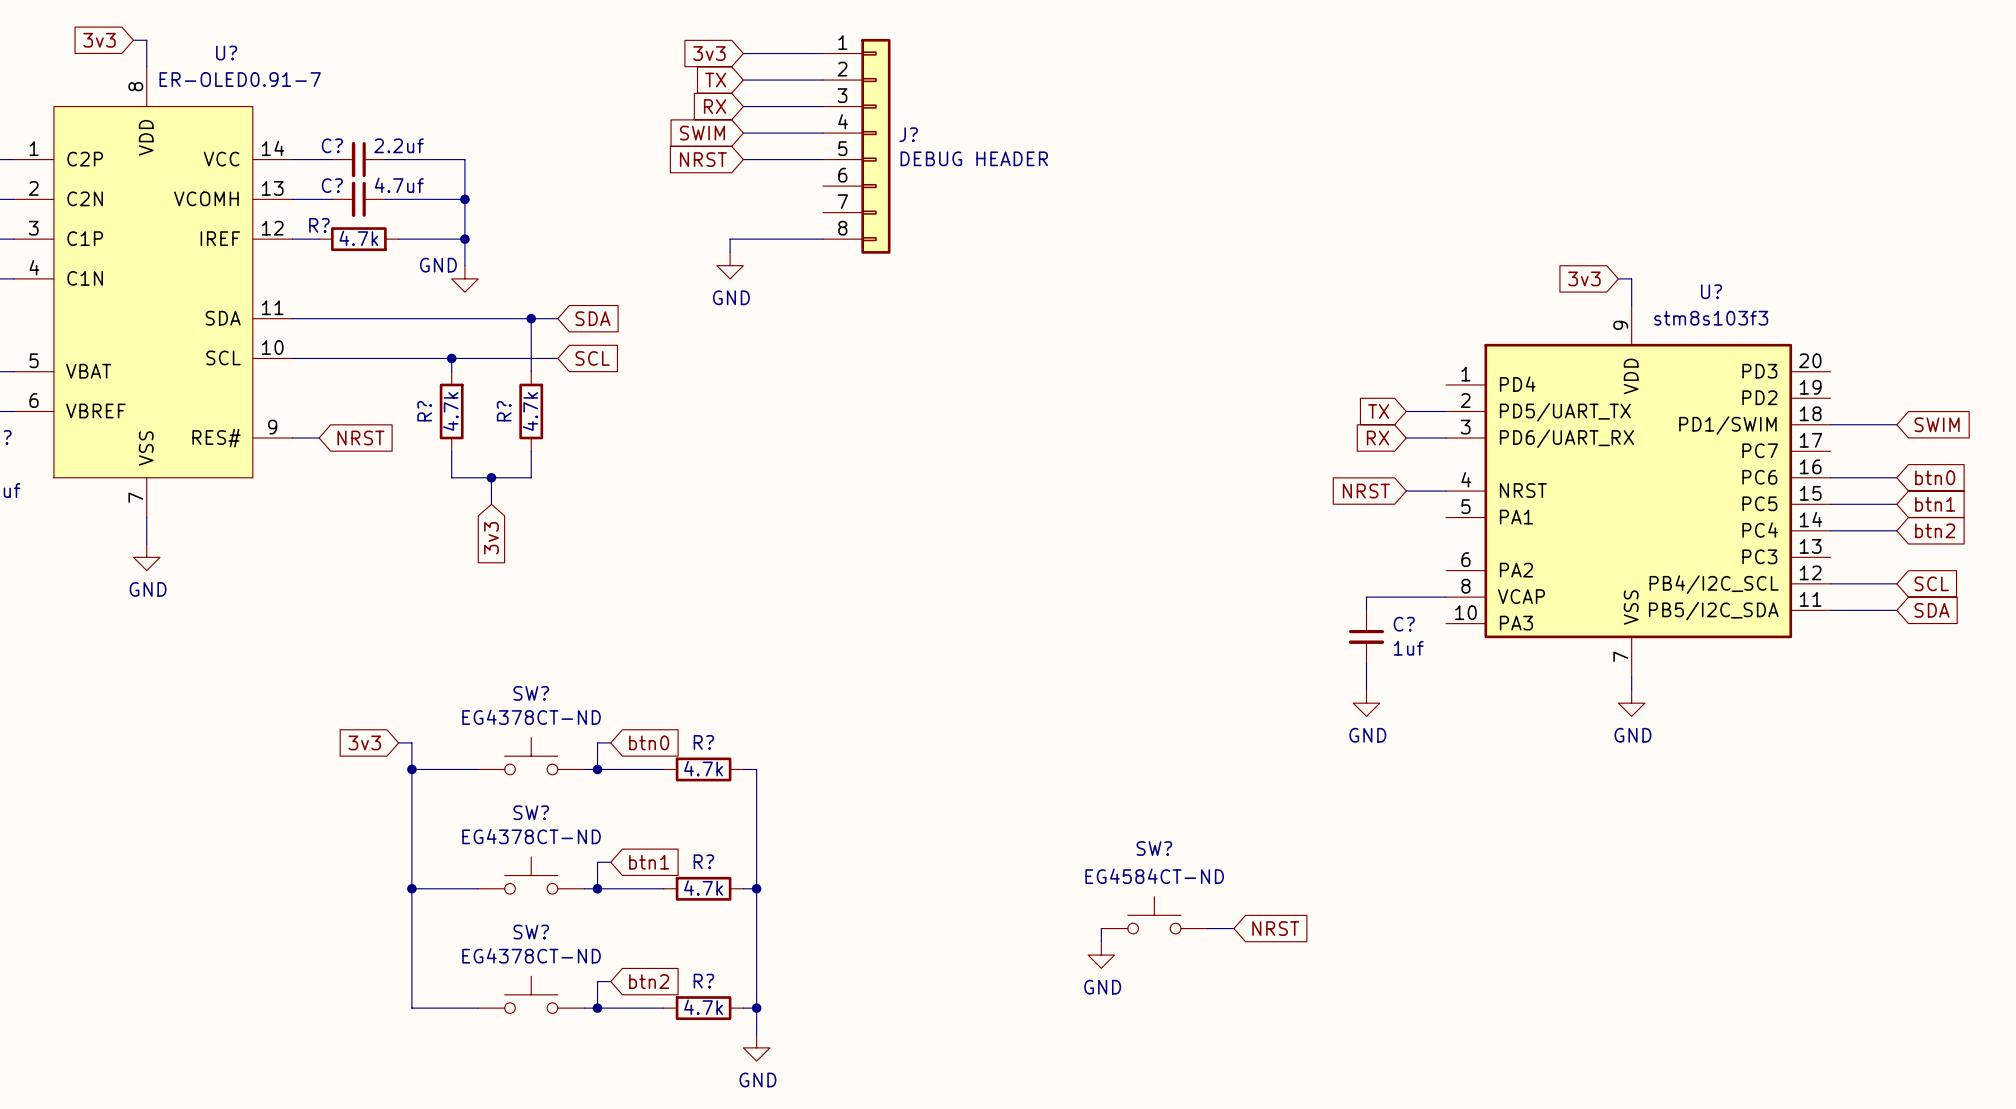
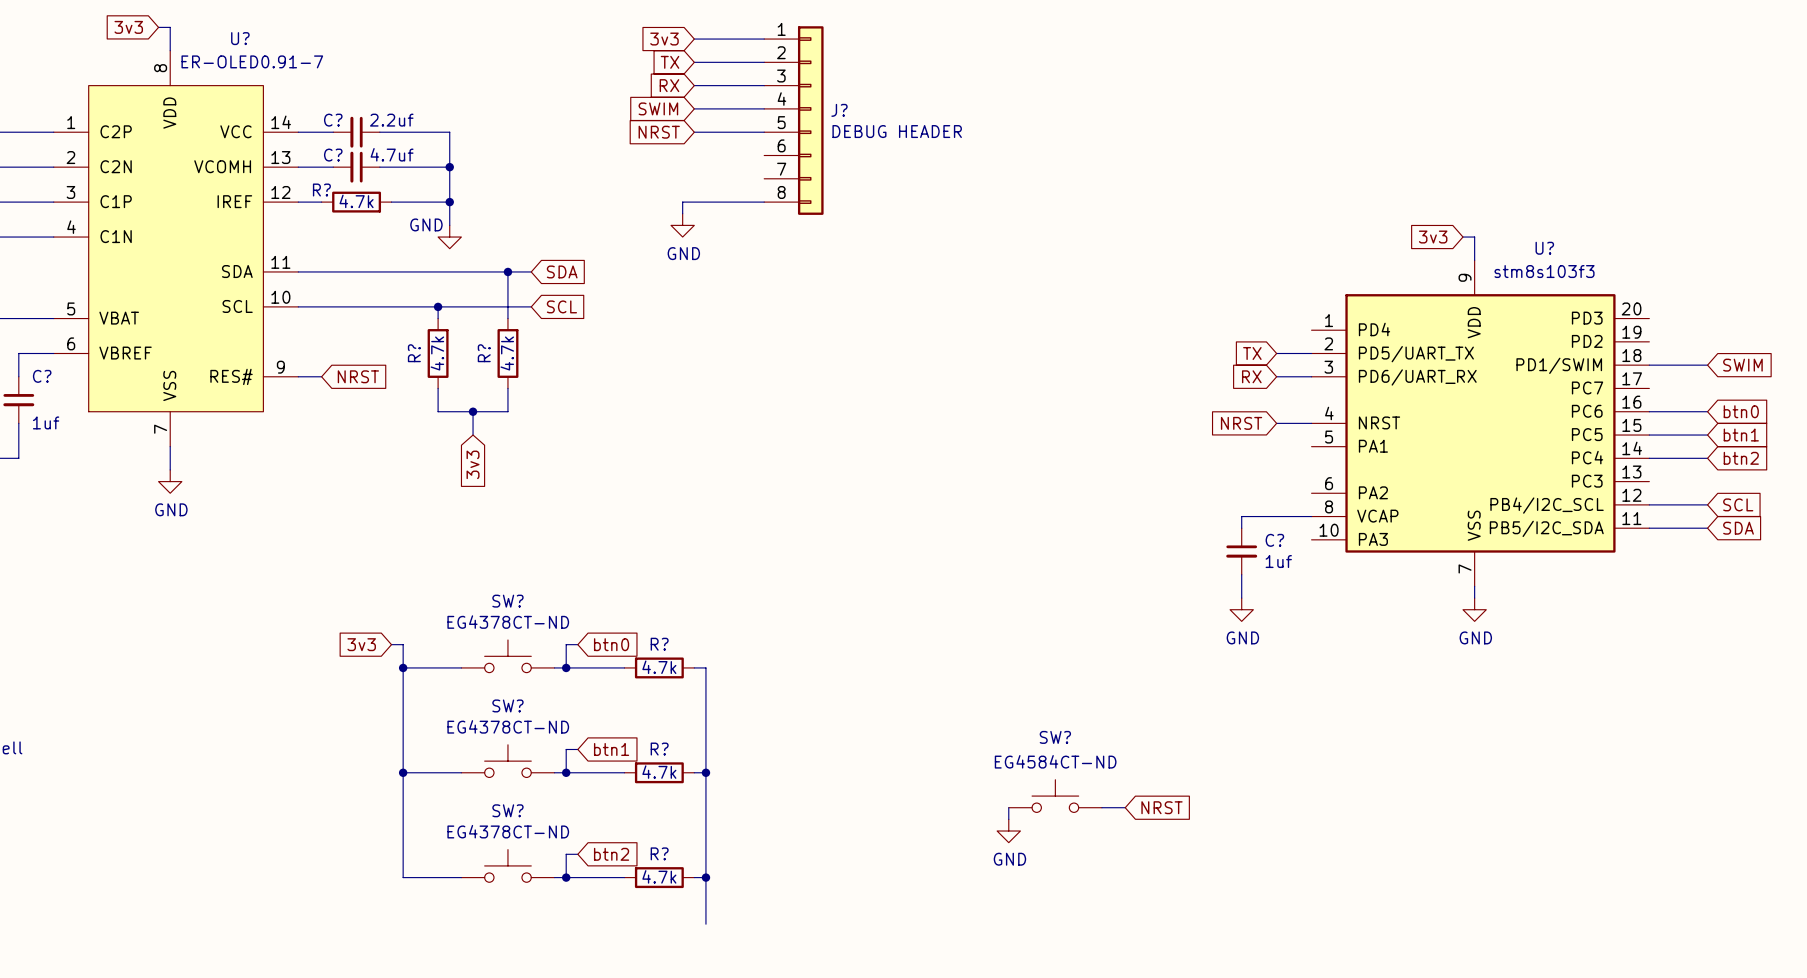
power symbol: GND (756, 1047) -> none

